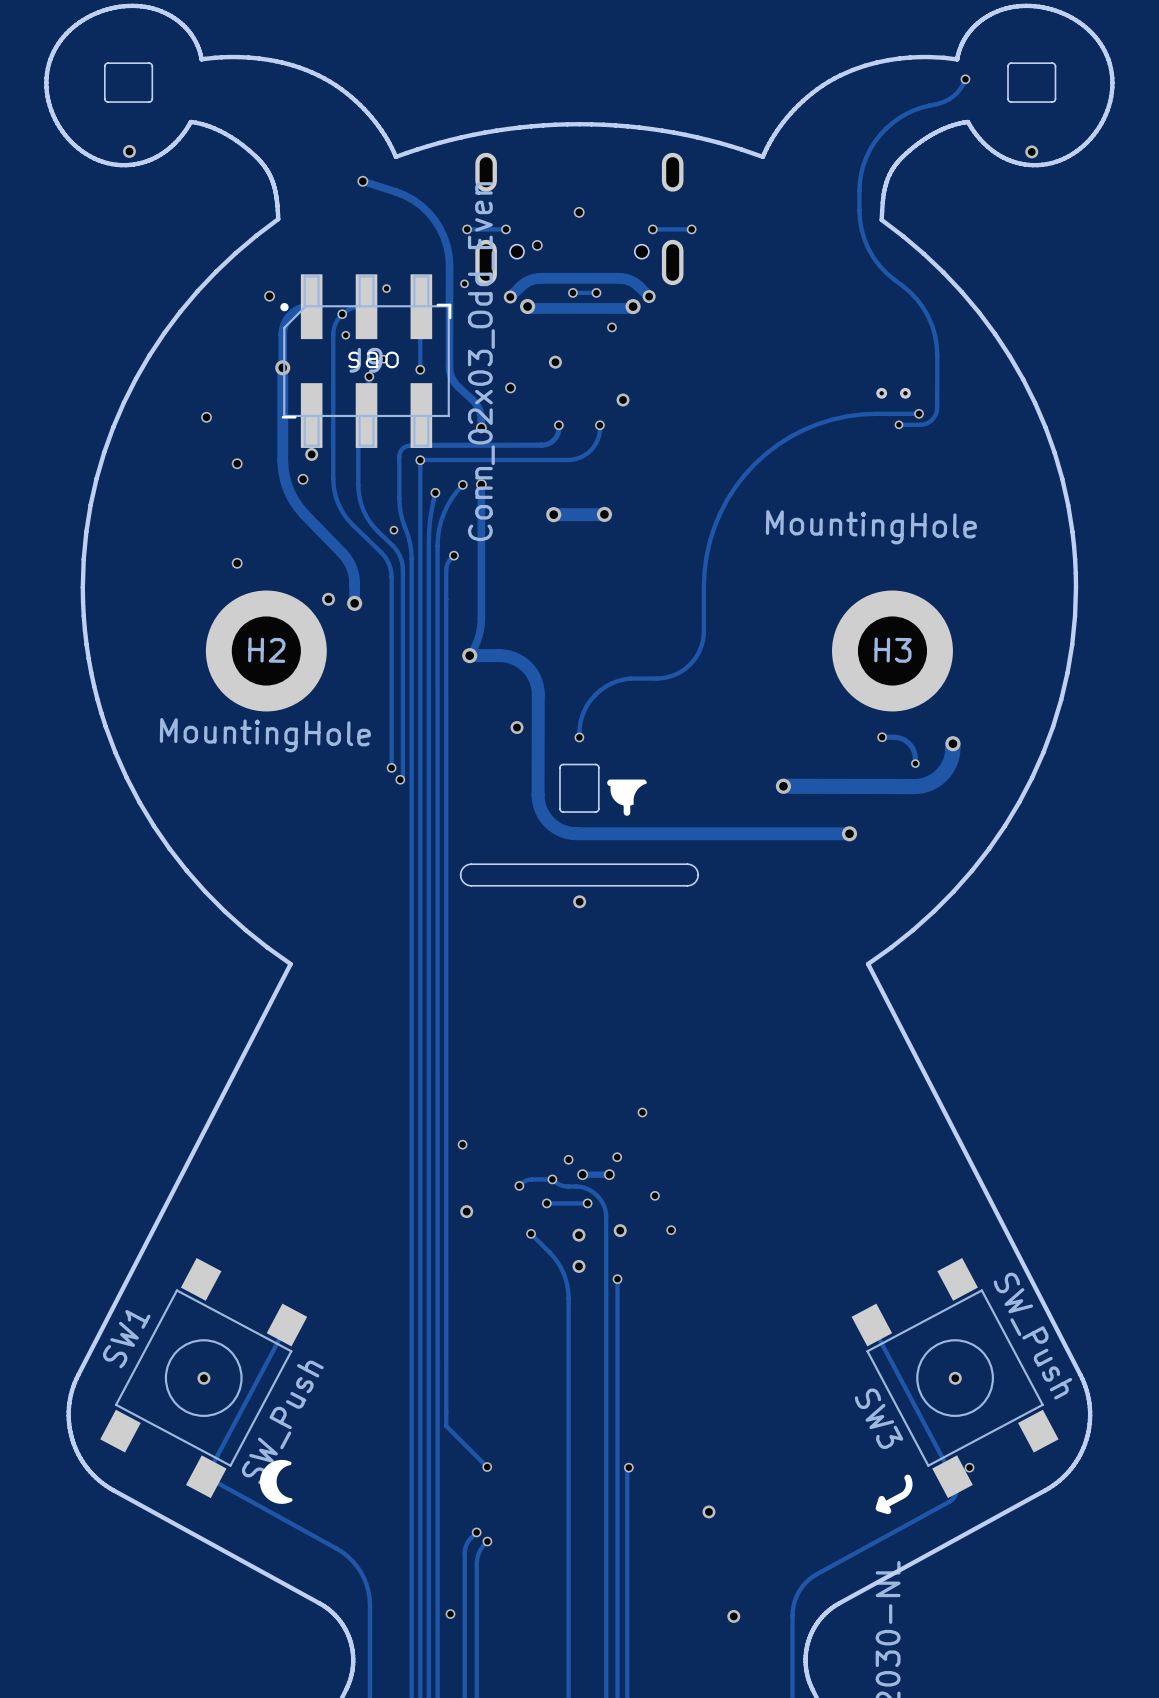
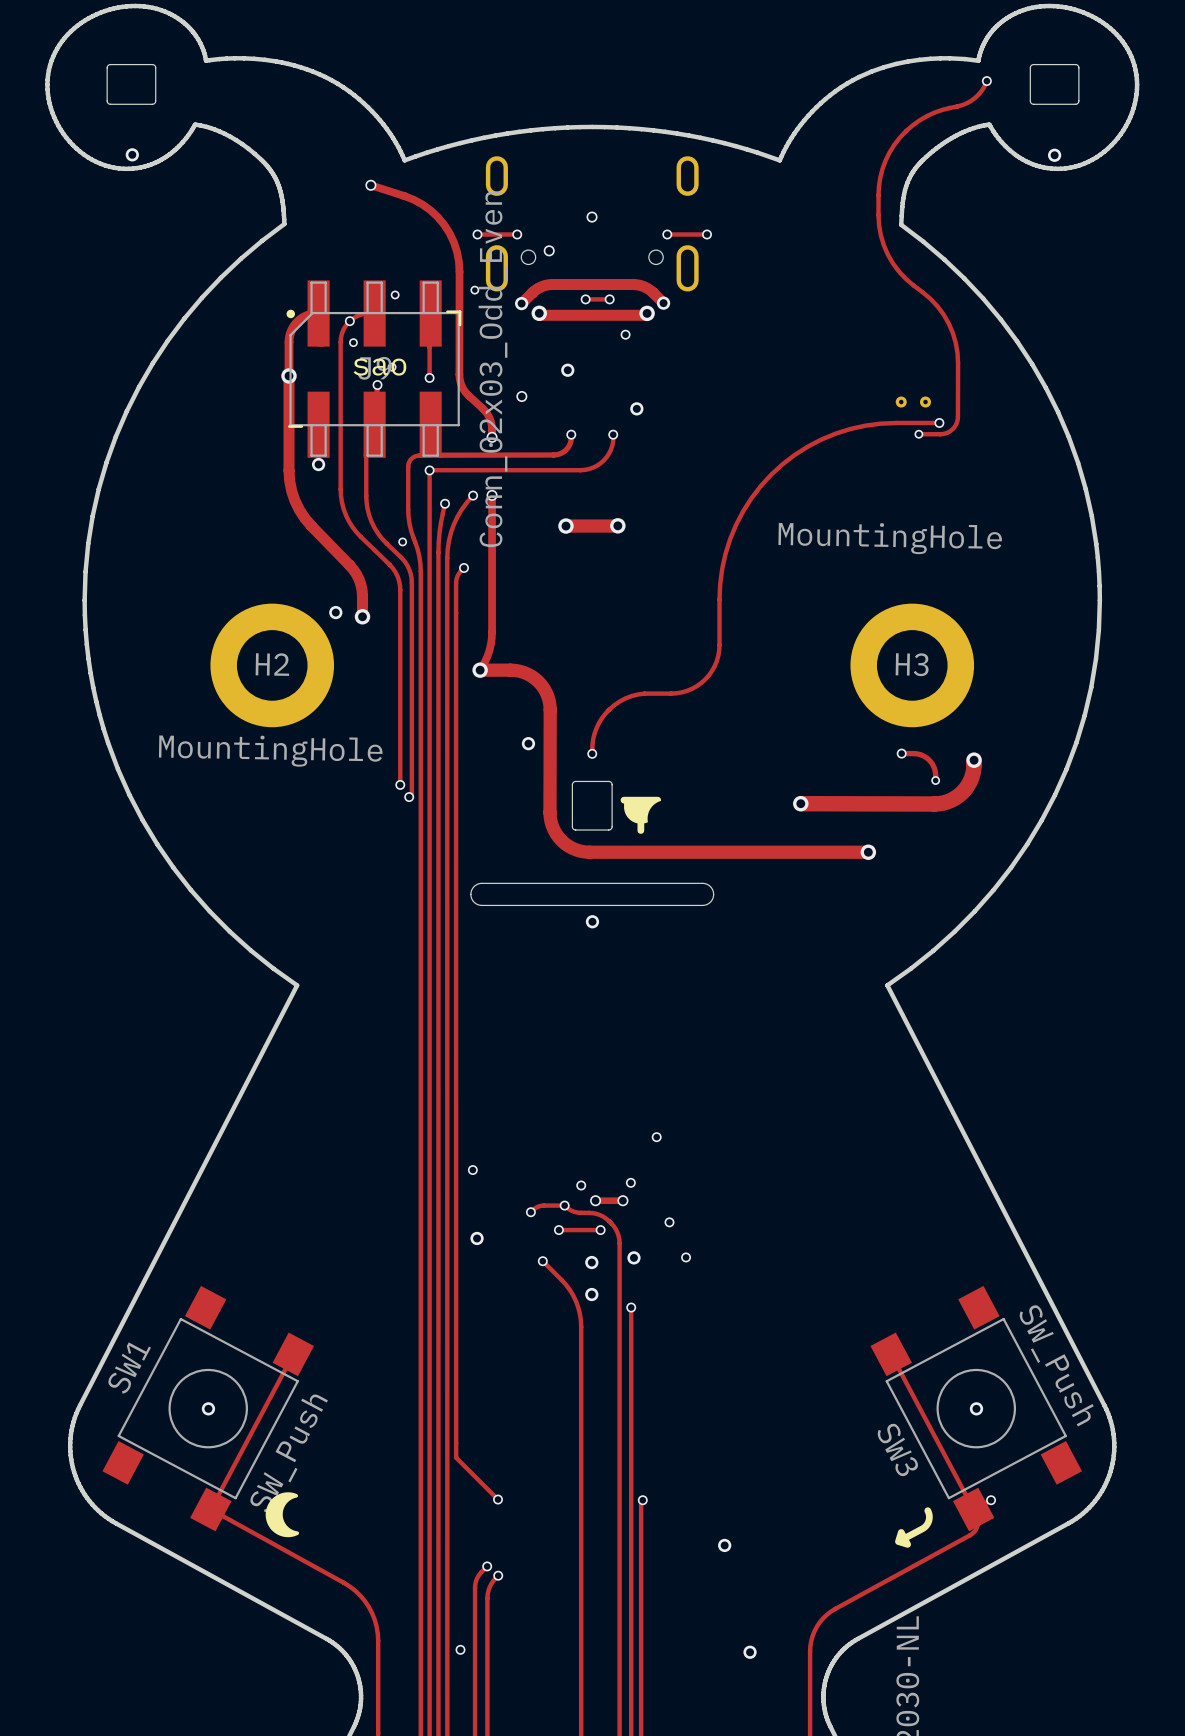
via: (269, 296) -> none
via: (206, 417) -> none
via: (237, 463) -> none
via: (303, 479) -> none
via: (237, 563) -> none

